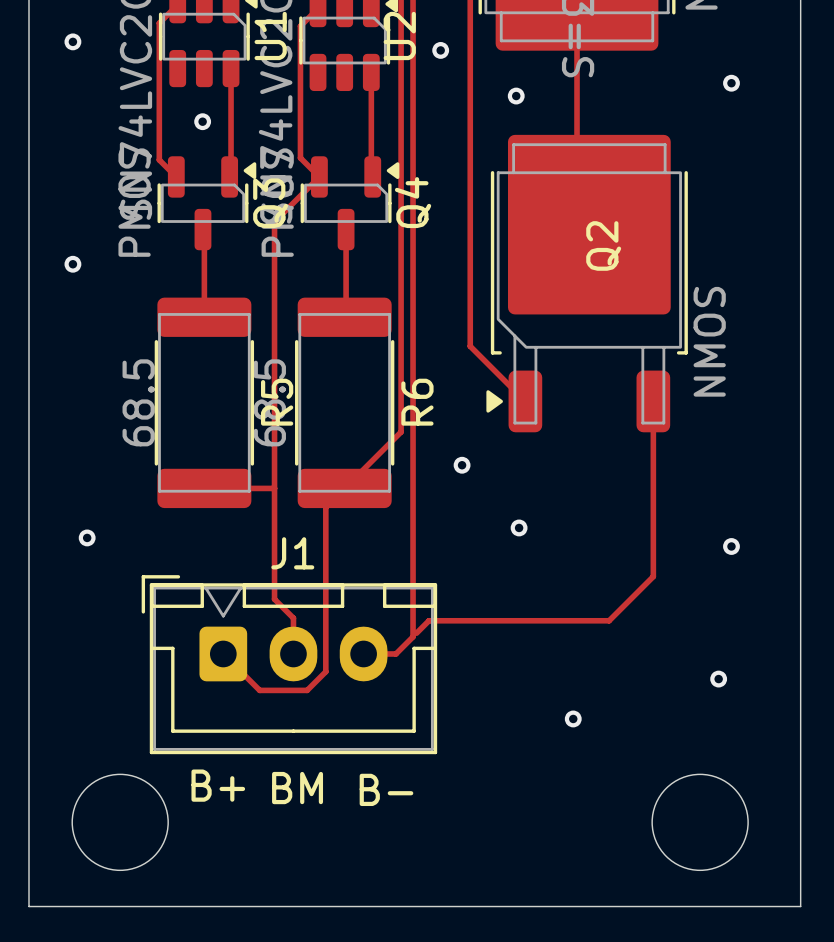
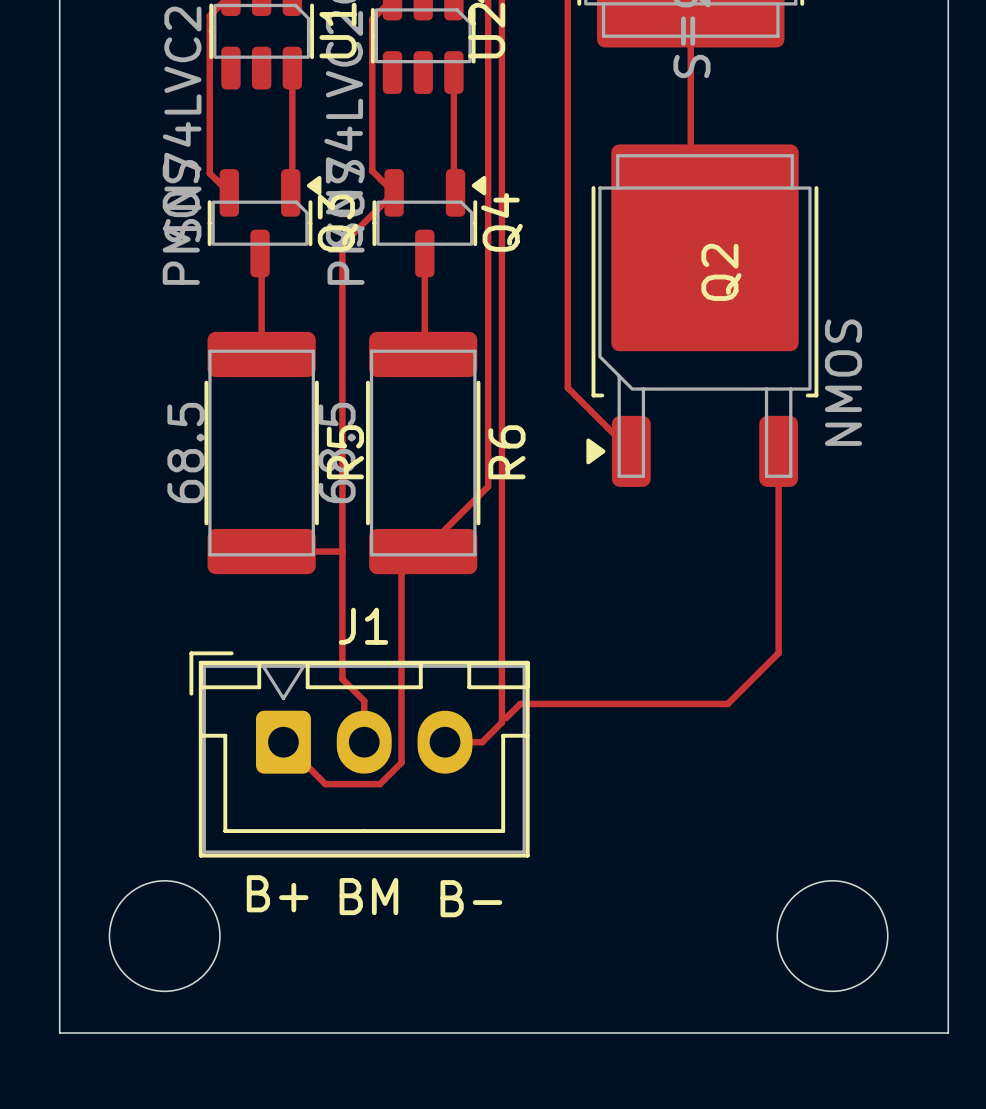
via: (72, 41) -> none
via: (440, 50) -> none
via: (731, 83) -> none
via: (516, 96) -> none
via: (202, 121) -> none
via: (72, 264) -> none
via: (462, 465) -> none
via: (519, 527) -> none
via: (87, 537) -> none
via: (731, 546) -> none
via: (718, 679) -> none
via: (573, 718) -> none

